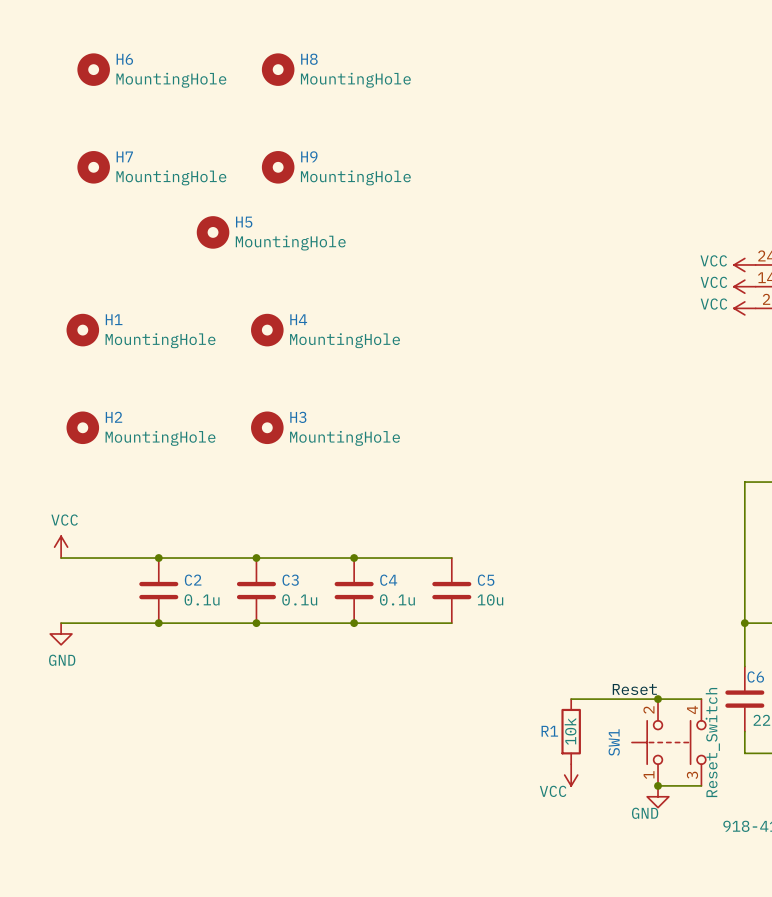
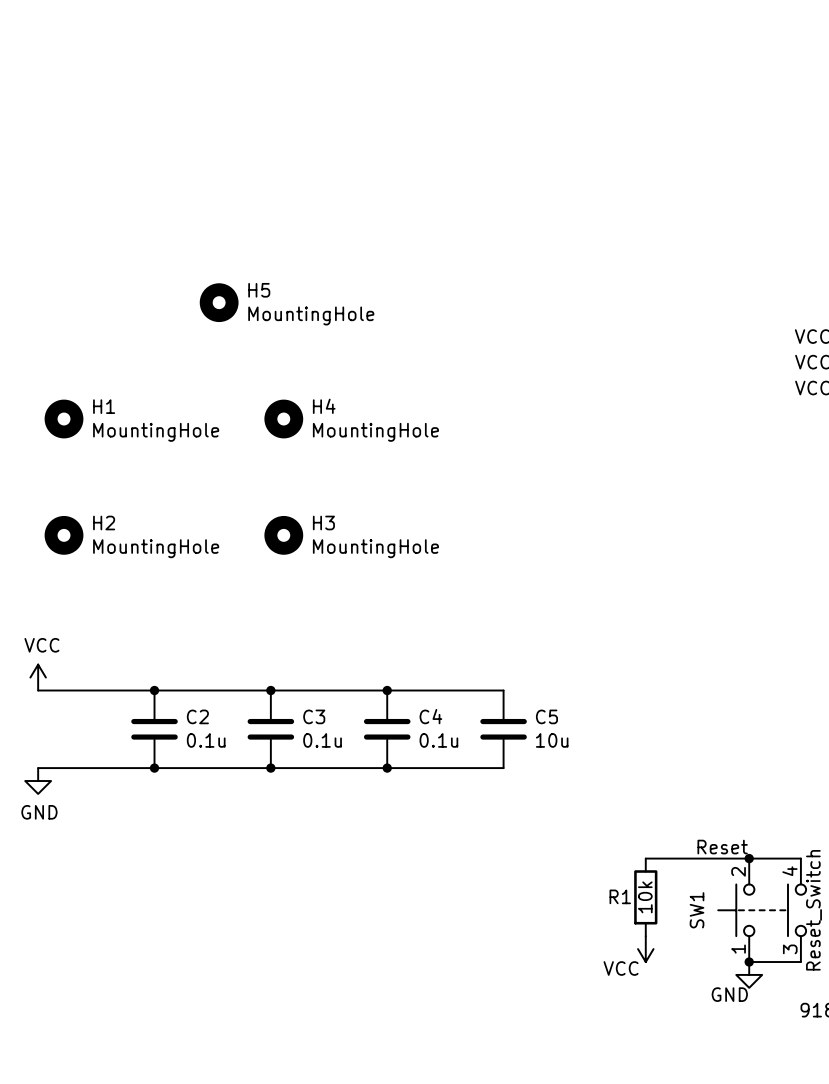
H6: MountingHole (93, 69) -> none
H8: MountingHole (278, 69) -> none
H7: MountingHole (93, 167) -> none
H9: MountingHole (278, 167) -> none

